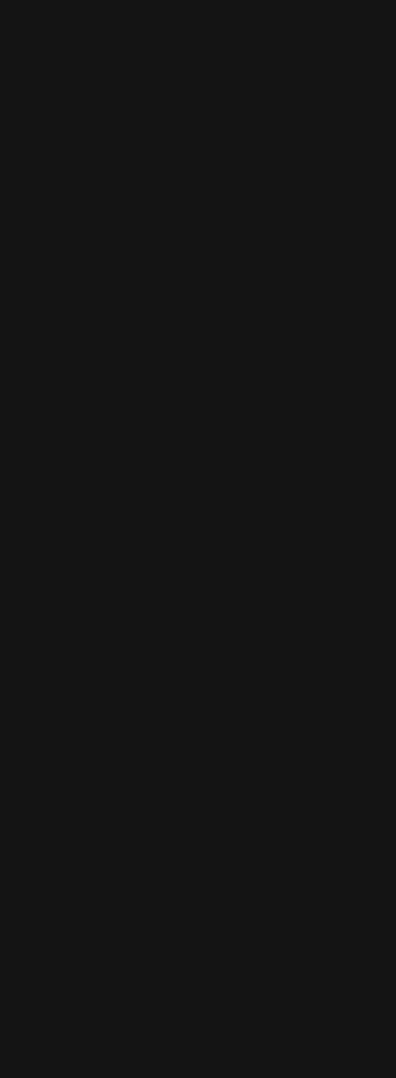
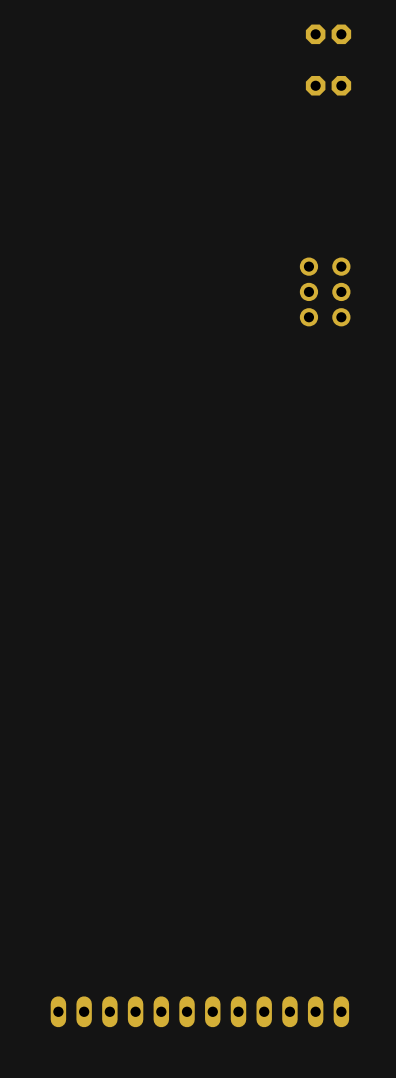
part: none -> (328, 34)
part: none -> (328, 85)
part: none -> (325, 291)
part: none -> (199, 1011)

